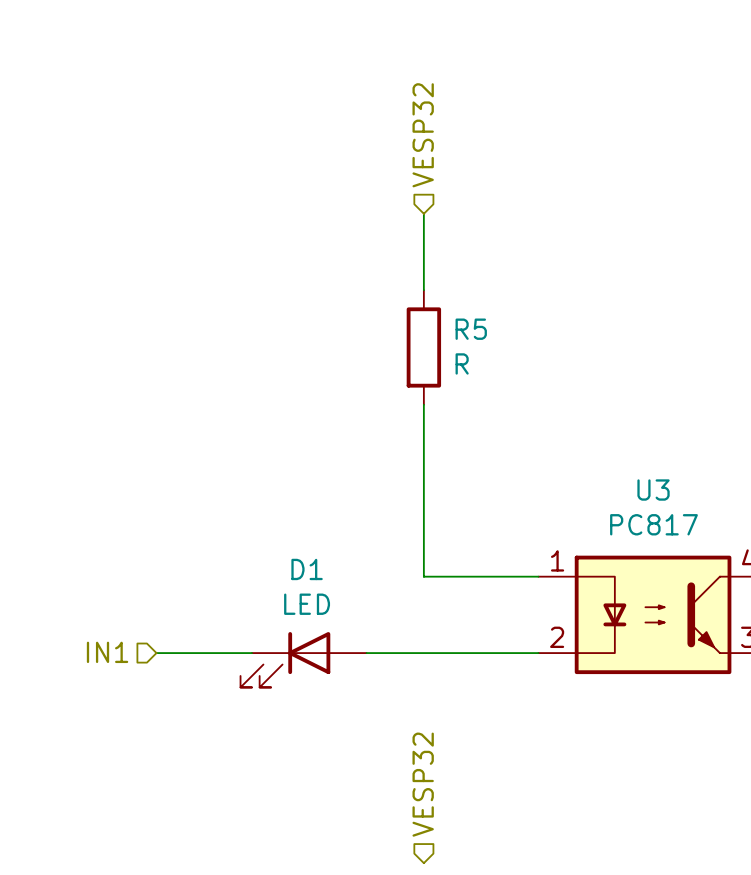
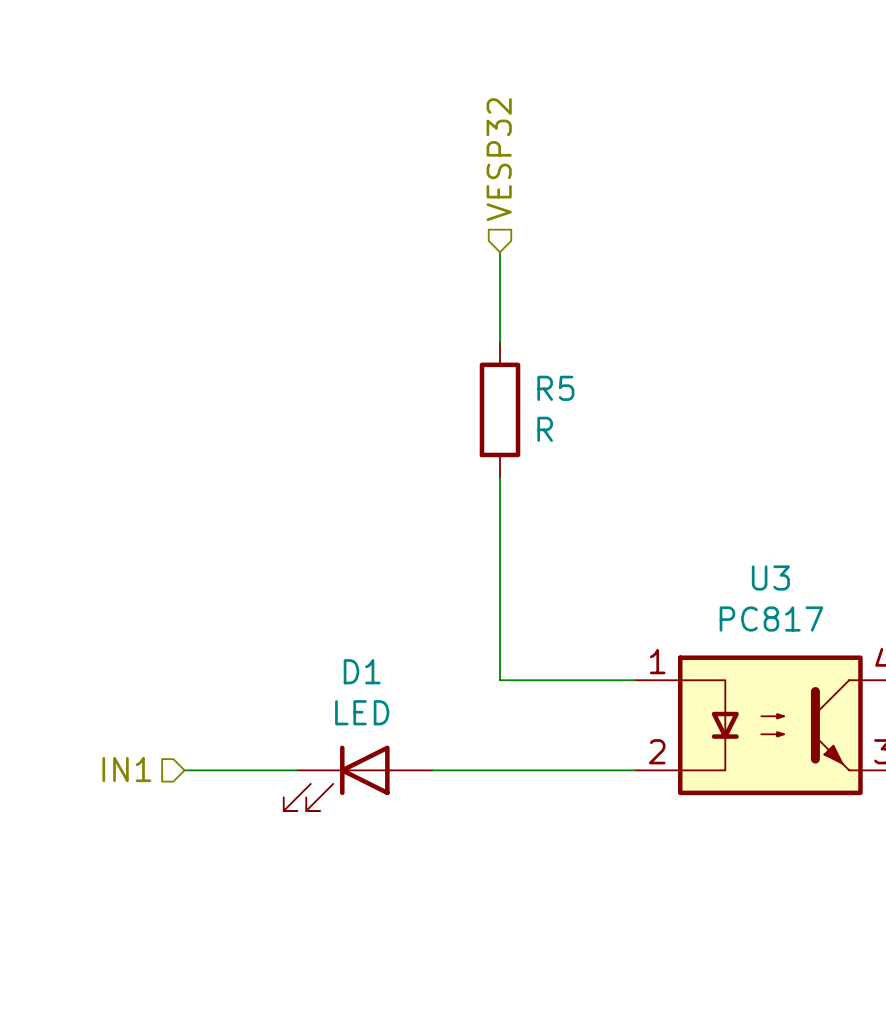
hierarchical label: VESP32 (423, 784) -> none

